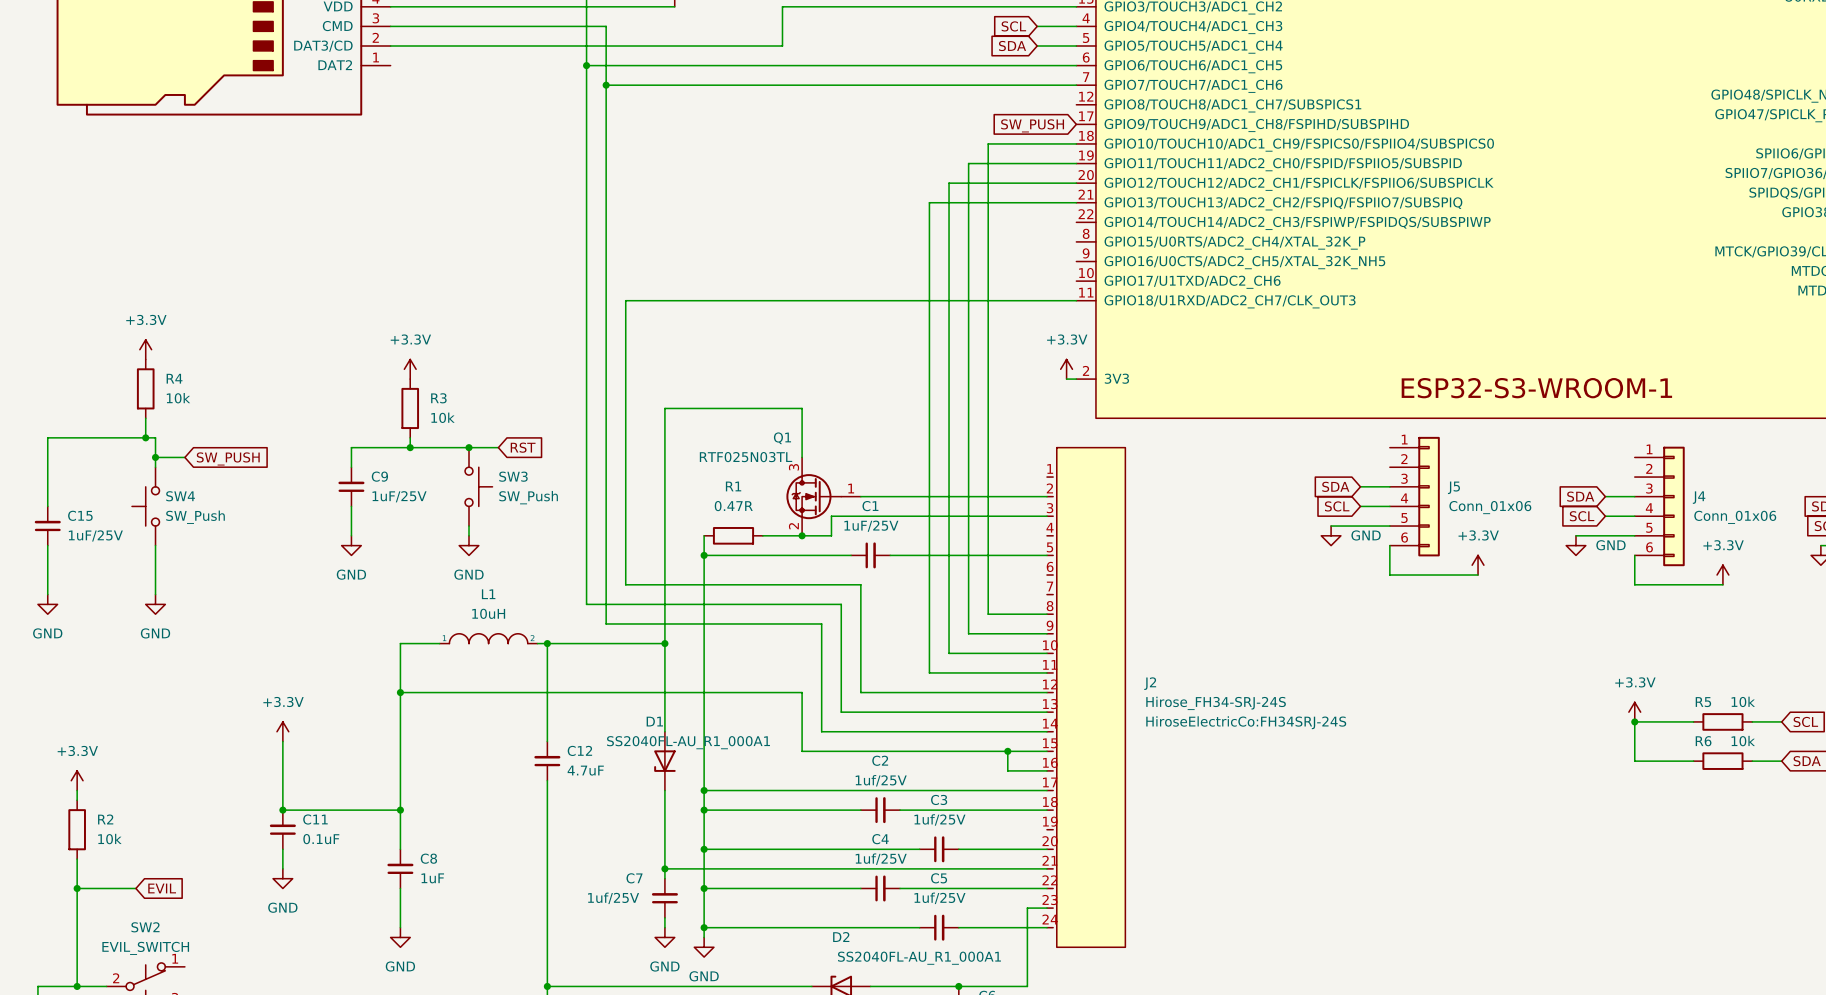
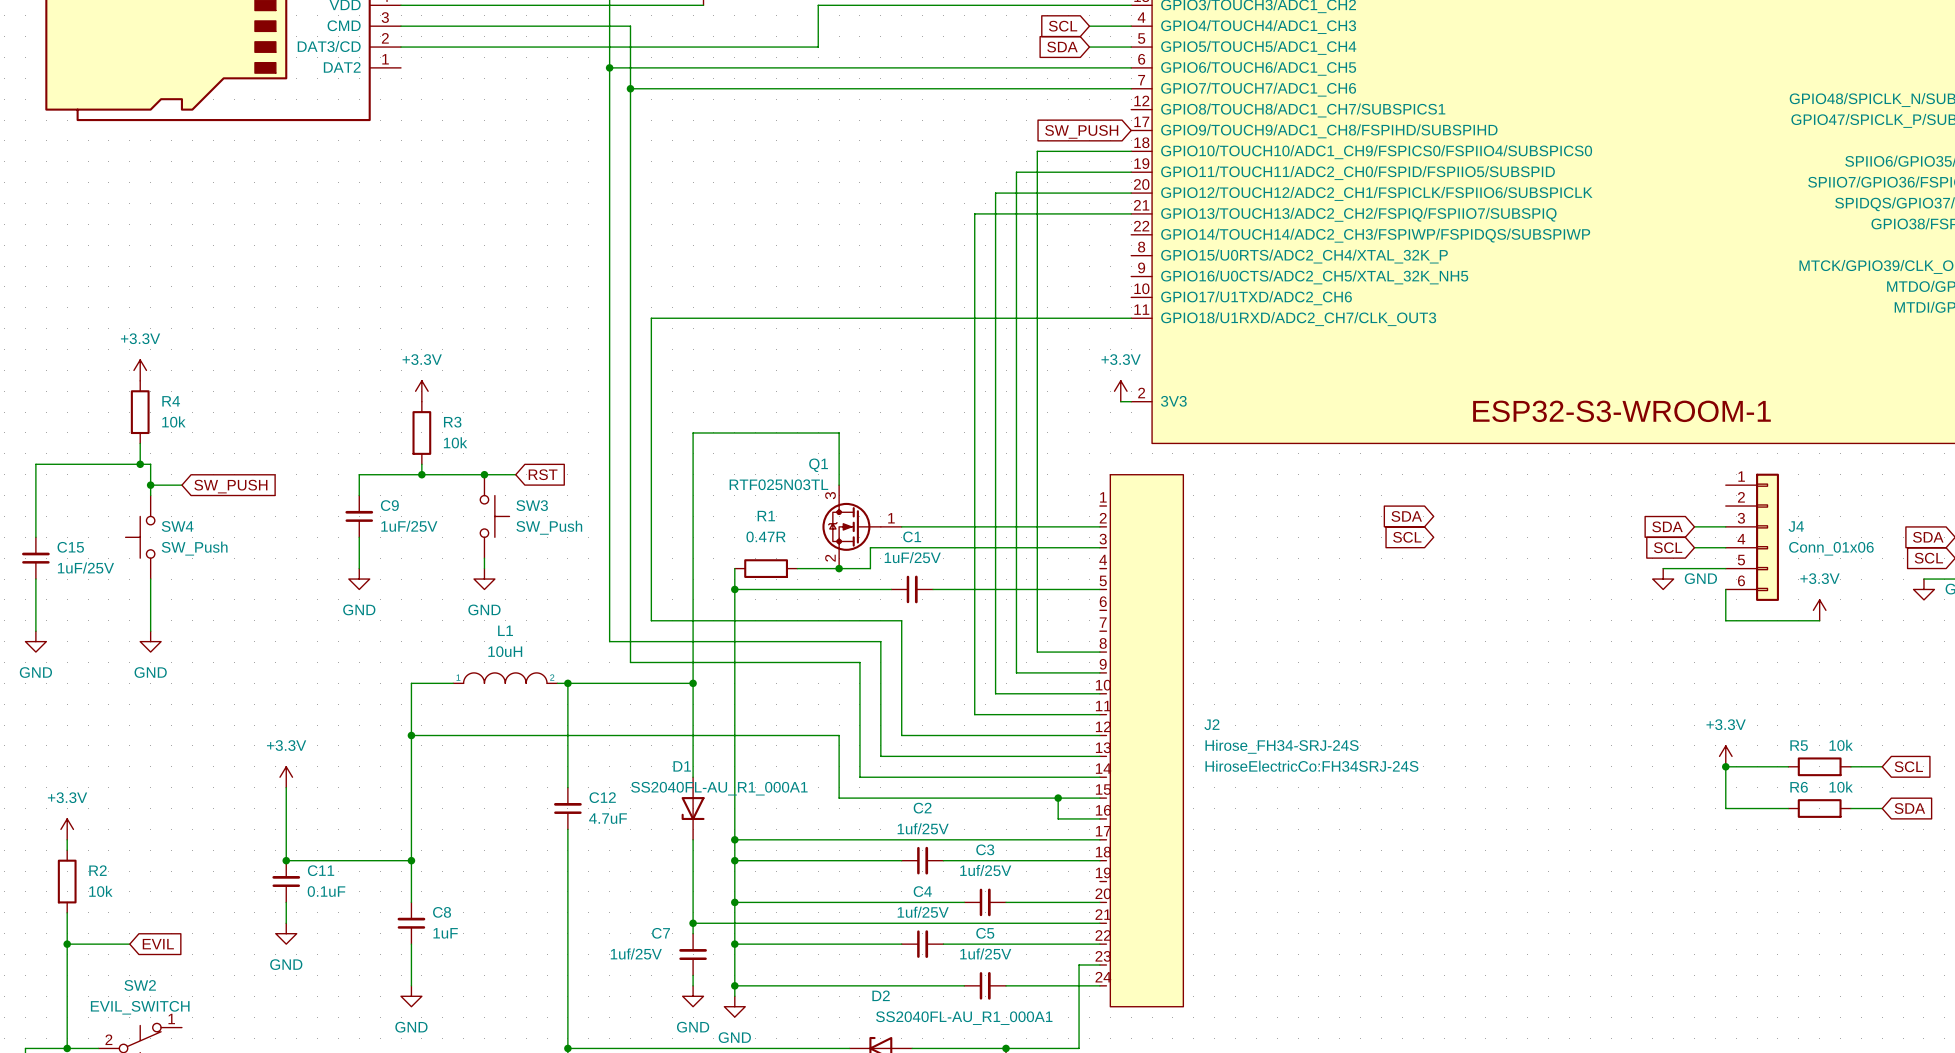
wire: (1360, 486) (1389, 486) -> none
J5: Conn_01x06 (1414, 496) -> none
wire: (1360, 506) (1389, 506) -> none
wire: (1331, 526) (1389, 526) -> none
power symbol: GND (1331, 535) -> none
wire: (1389, 545) (1389, 575) (1478, 575) -> none
power symbol: +3.3V (1478, 565) -> none

